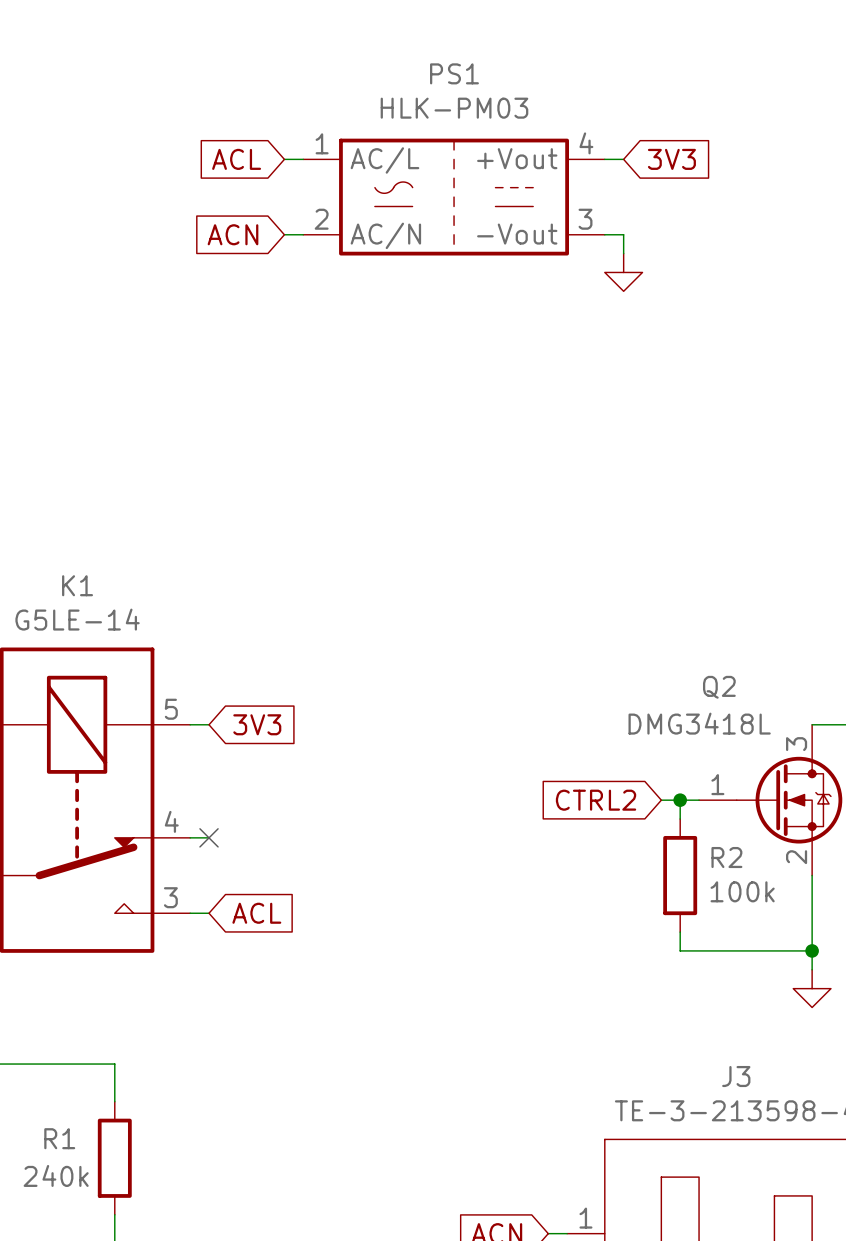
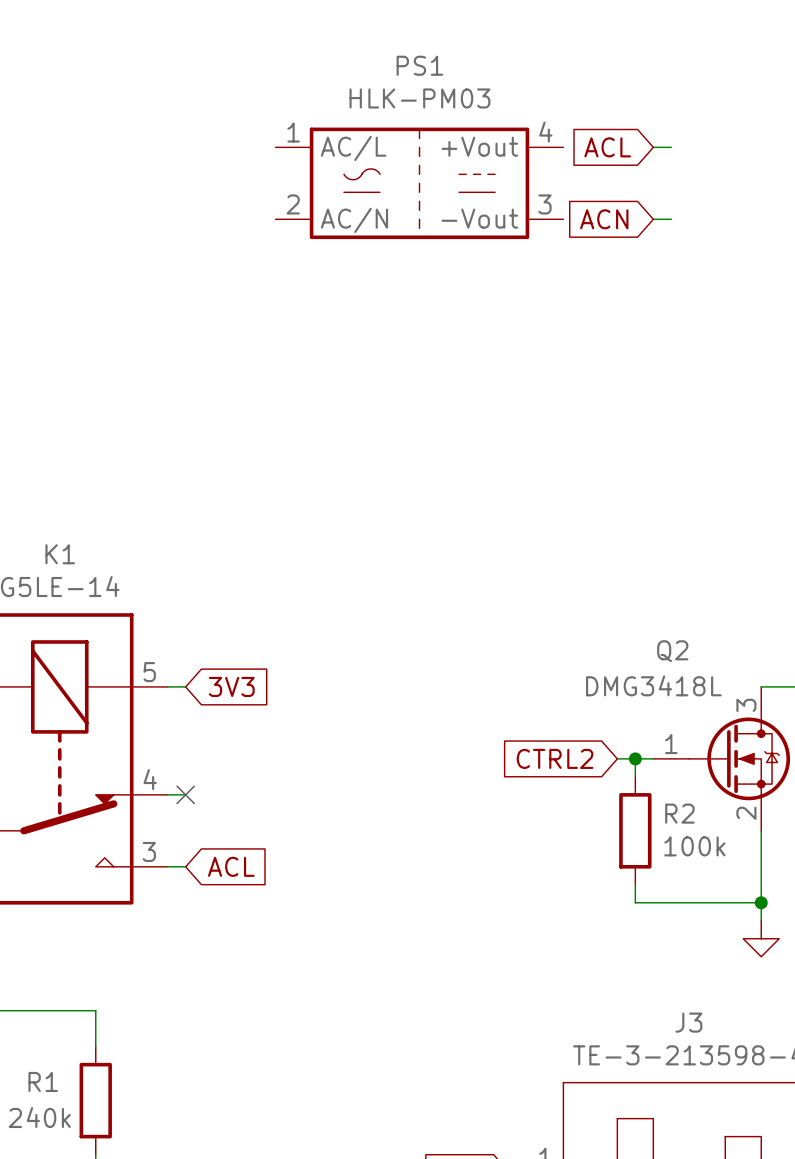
global label: ACL (236, 159) -> none
wire: (284, 159) (303, 159) -> none
wire: (604, 159) (623, 159) -> (653, 147) (671, 147)
global label: none -> ACL (607, 147)
global label: 3V3 (671, 159) -> none
global label: ACN (233, 234) -> none
wire: (284, 234) (303, 234) -> none
wire: (604, 234) (623, 234) (623, 253) -> none
global label: none -> ACN (604, 219)
wire: none -> (653, 219) (671, 219)
power symbol: (623, 272) -> none

